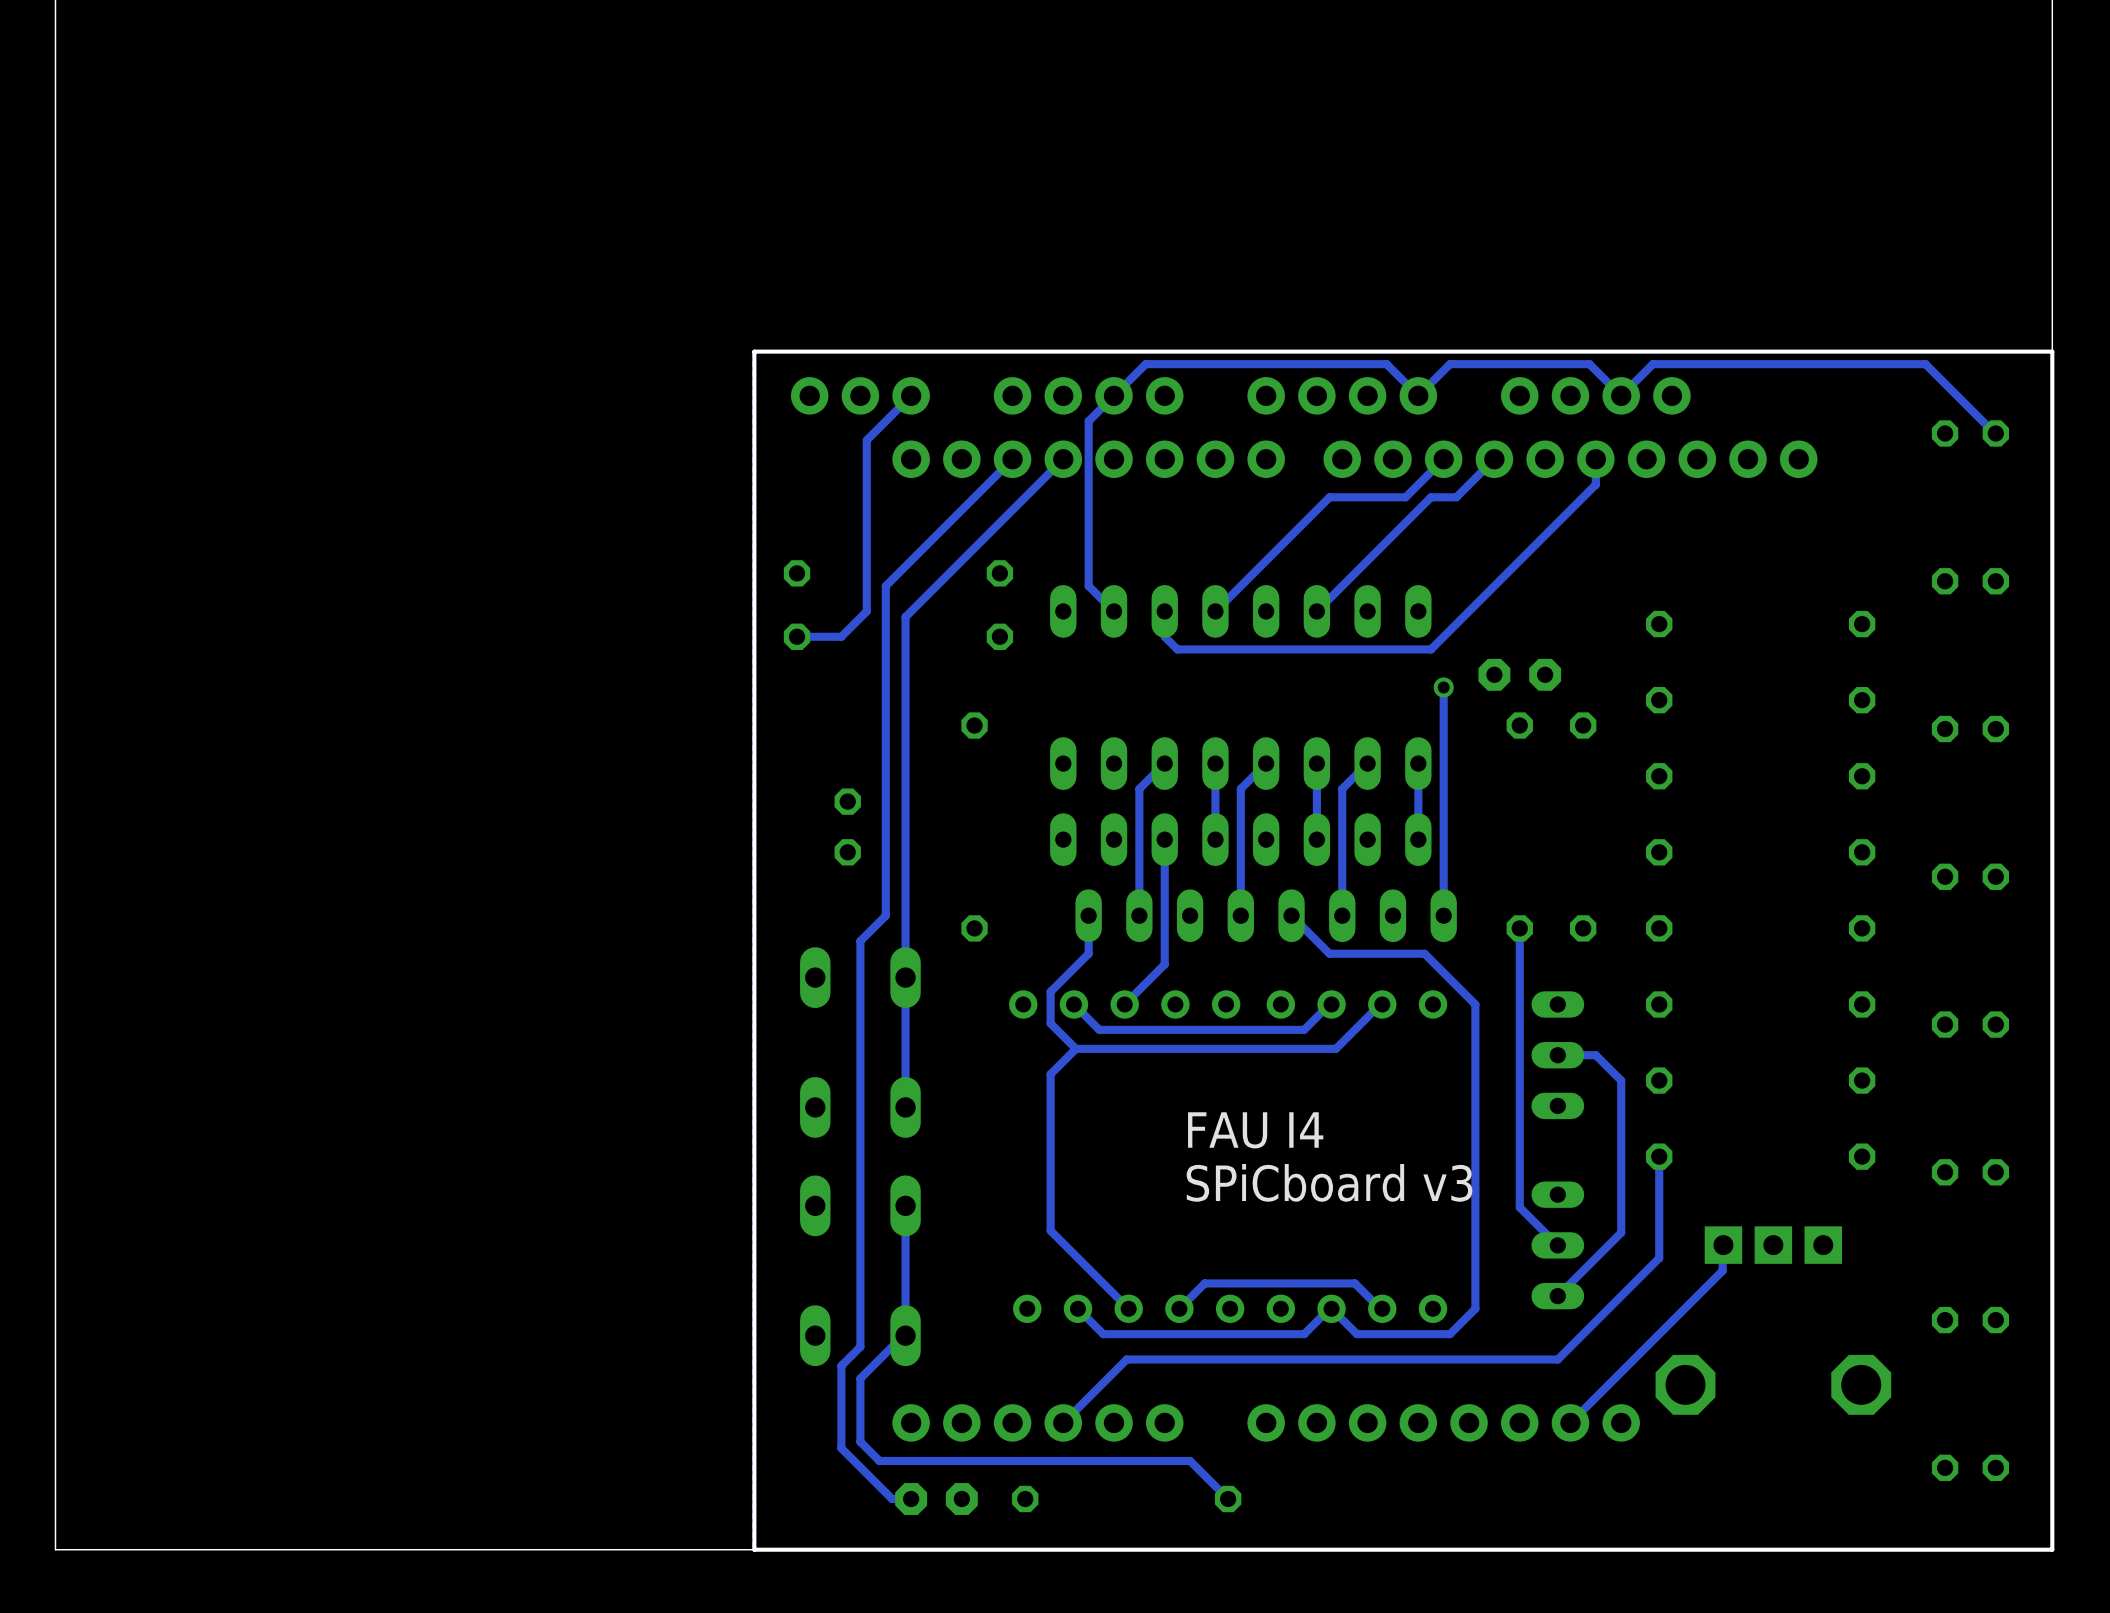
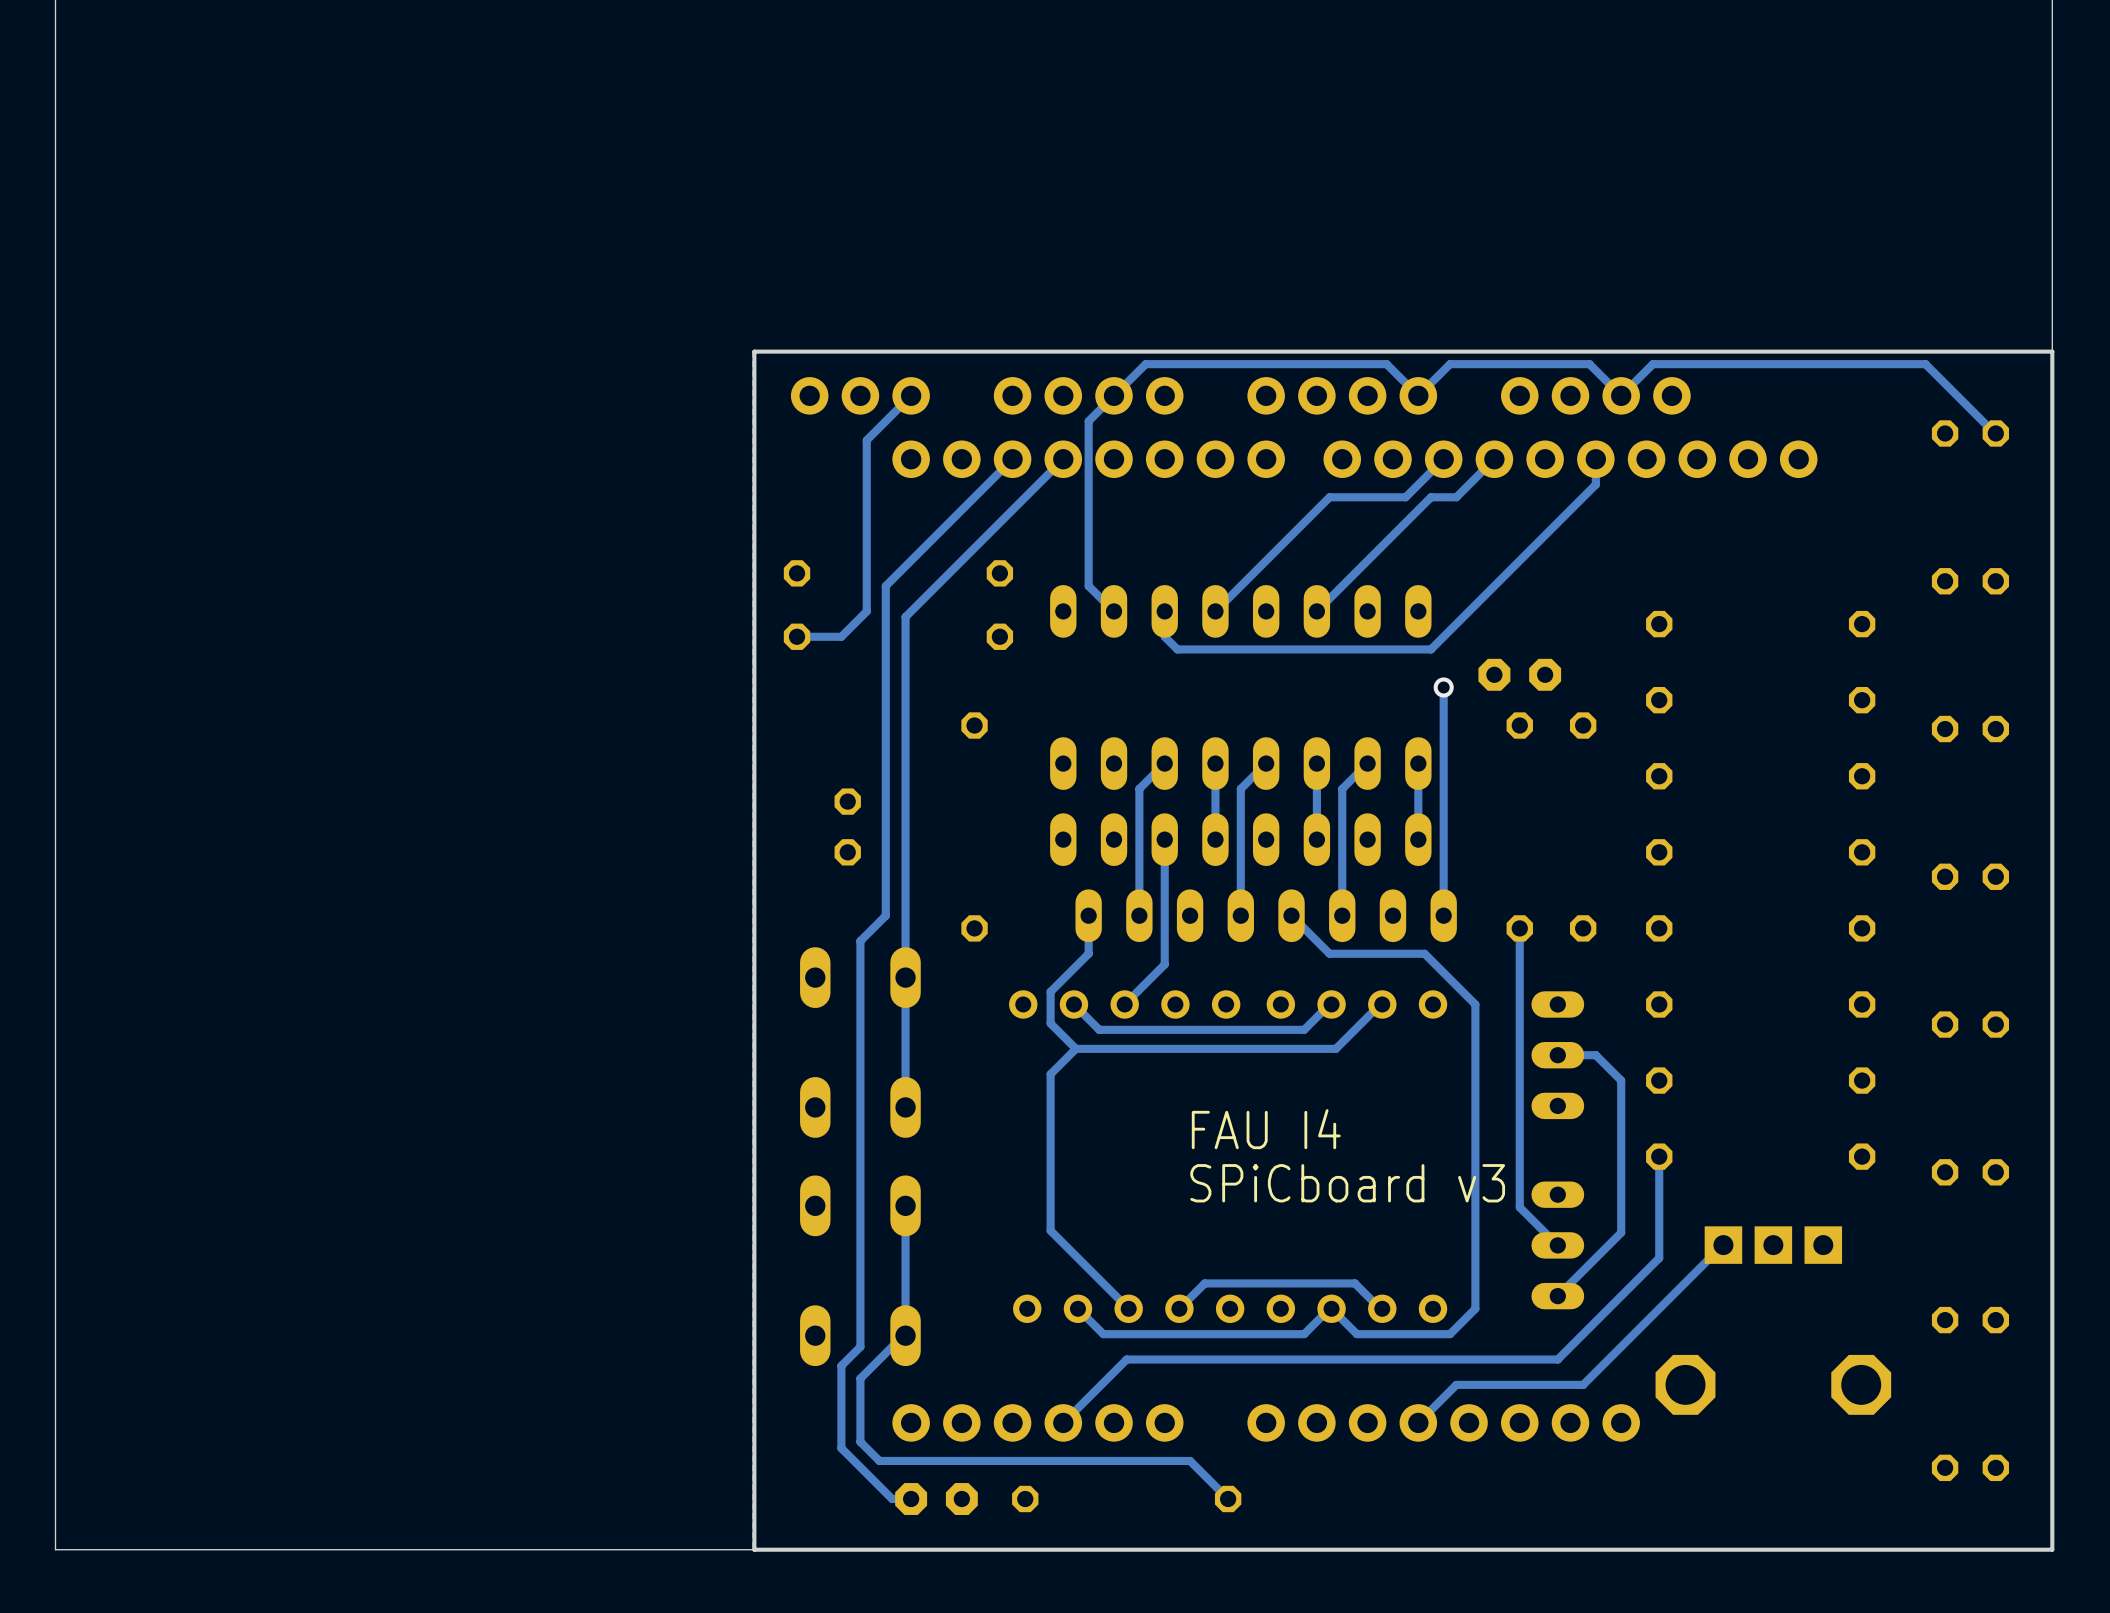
track: (1722, 1245) (1722, 1270) (1570, 1422) -> (1722, 1245) (1583, 1384) (1456, 1384) (1418, 1422)

